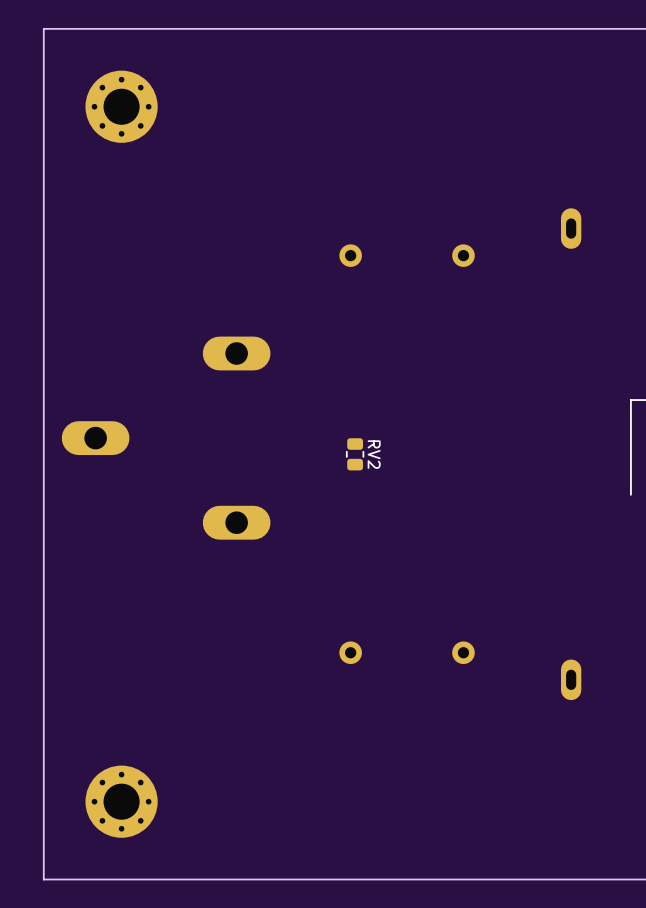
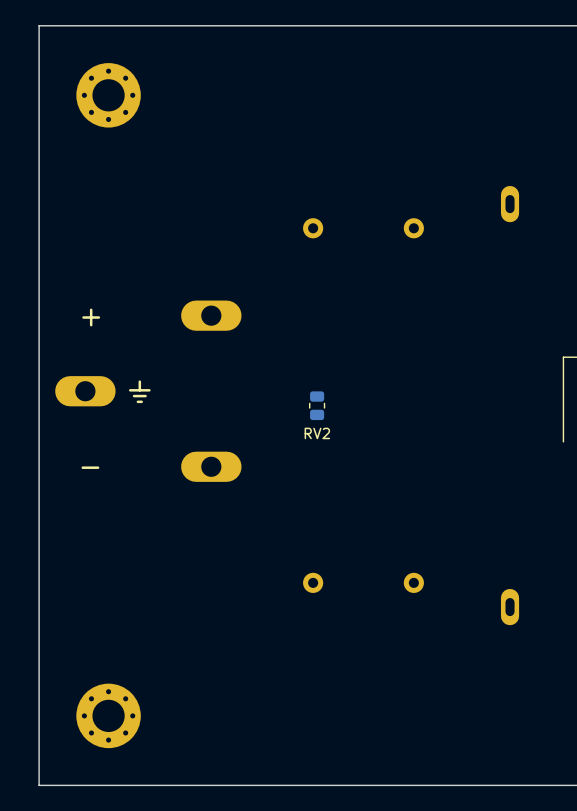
text: none -> + (91, 317)
text: none -> ⏚ (139, 391)
RV2 name rotation: 0° (374, 454) -> 90° counterclockwise (317, 433)
text: none -> - (90, 467)

